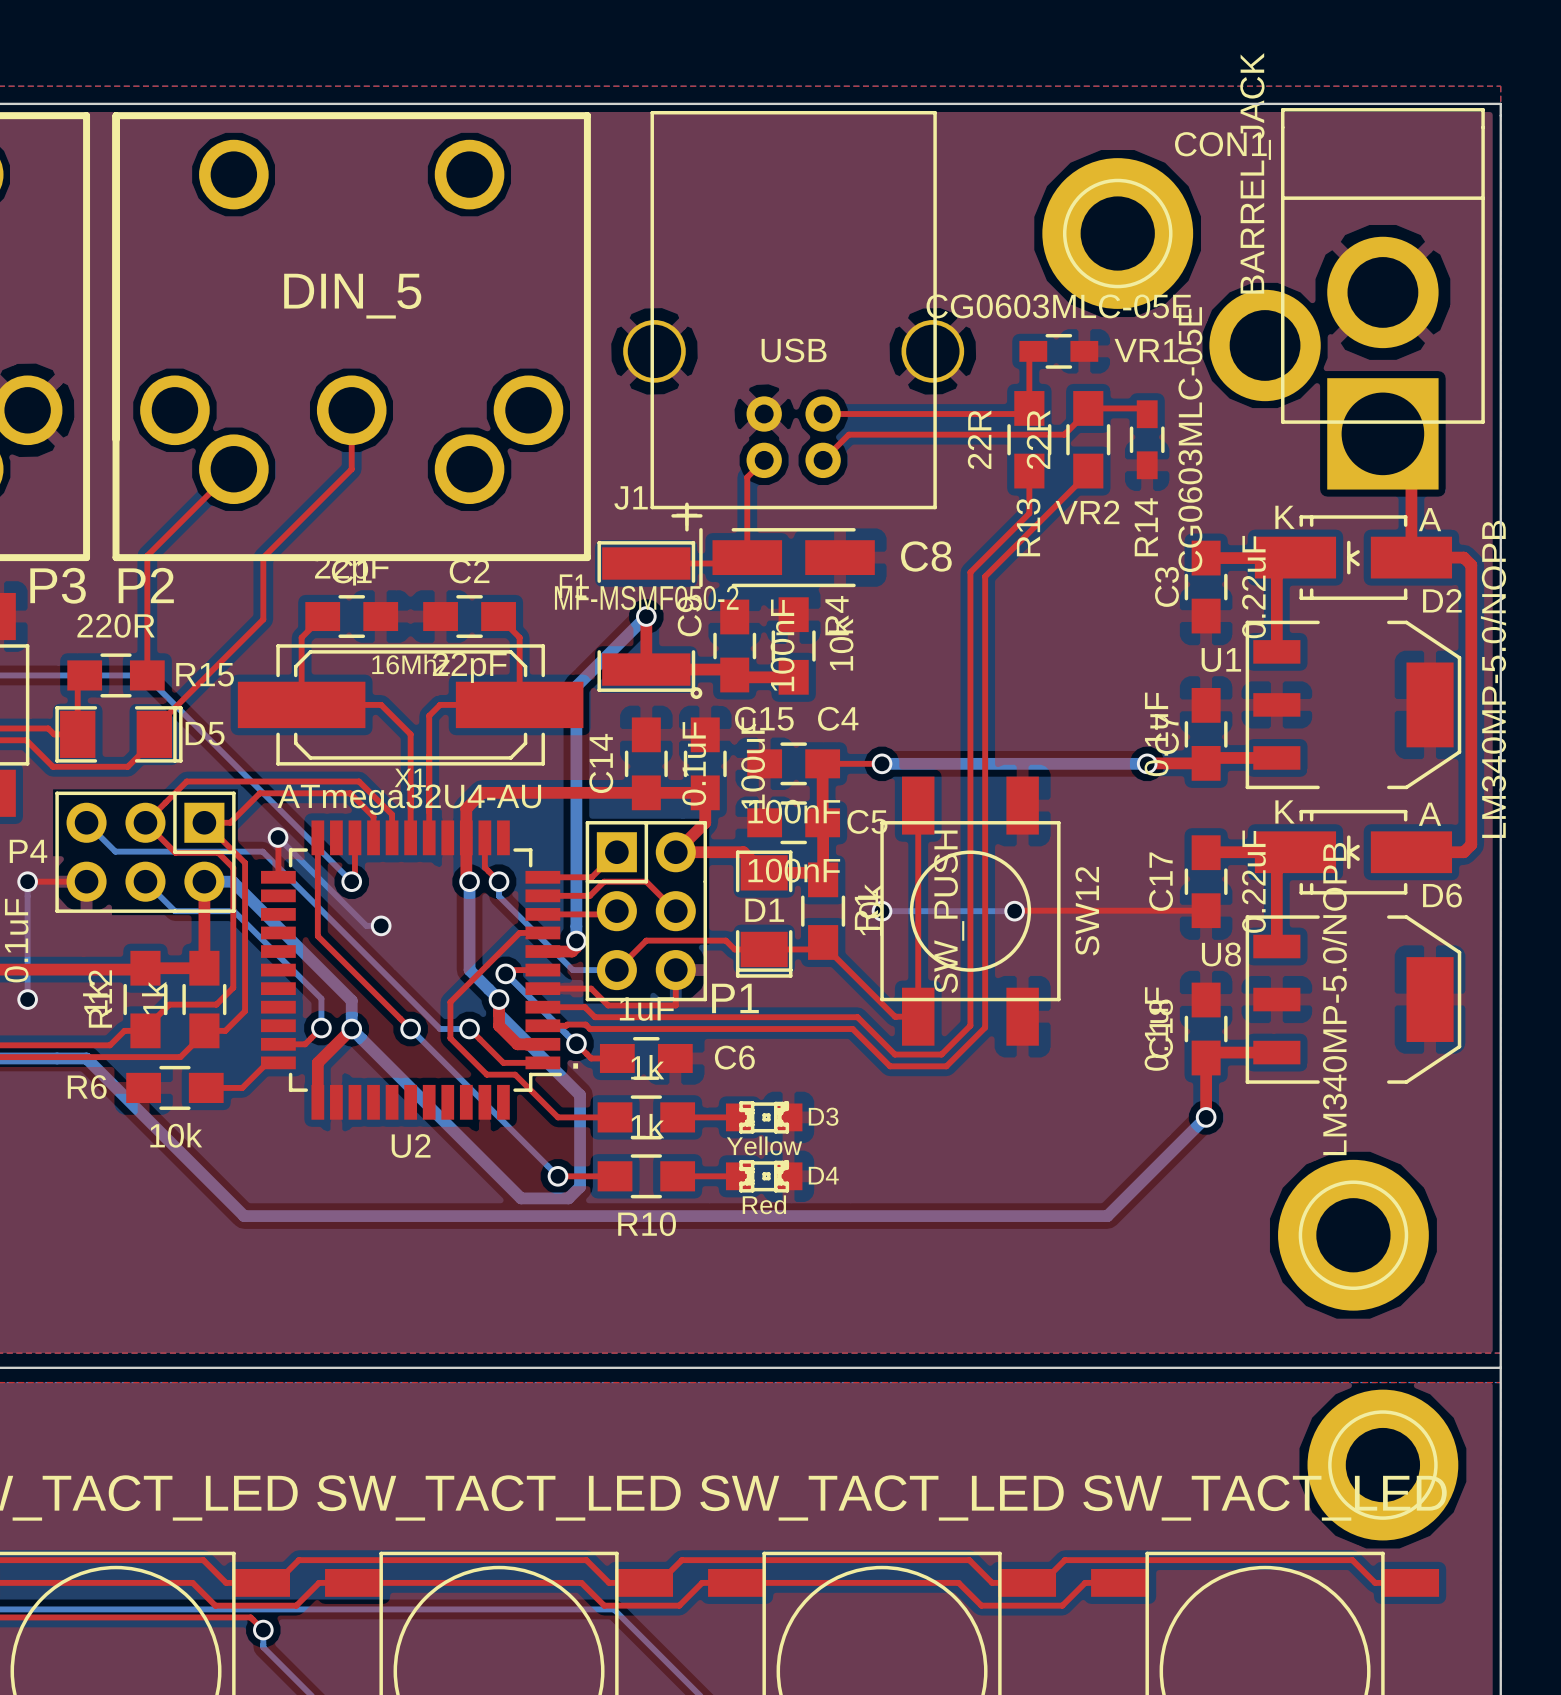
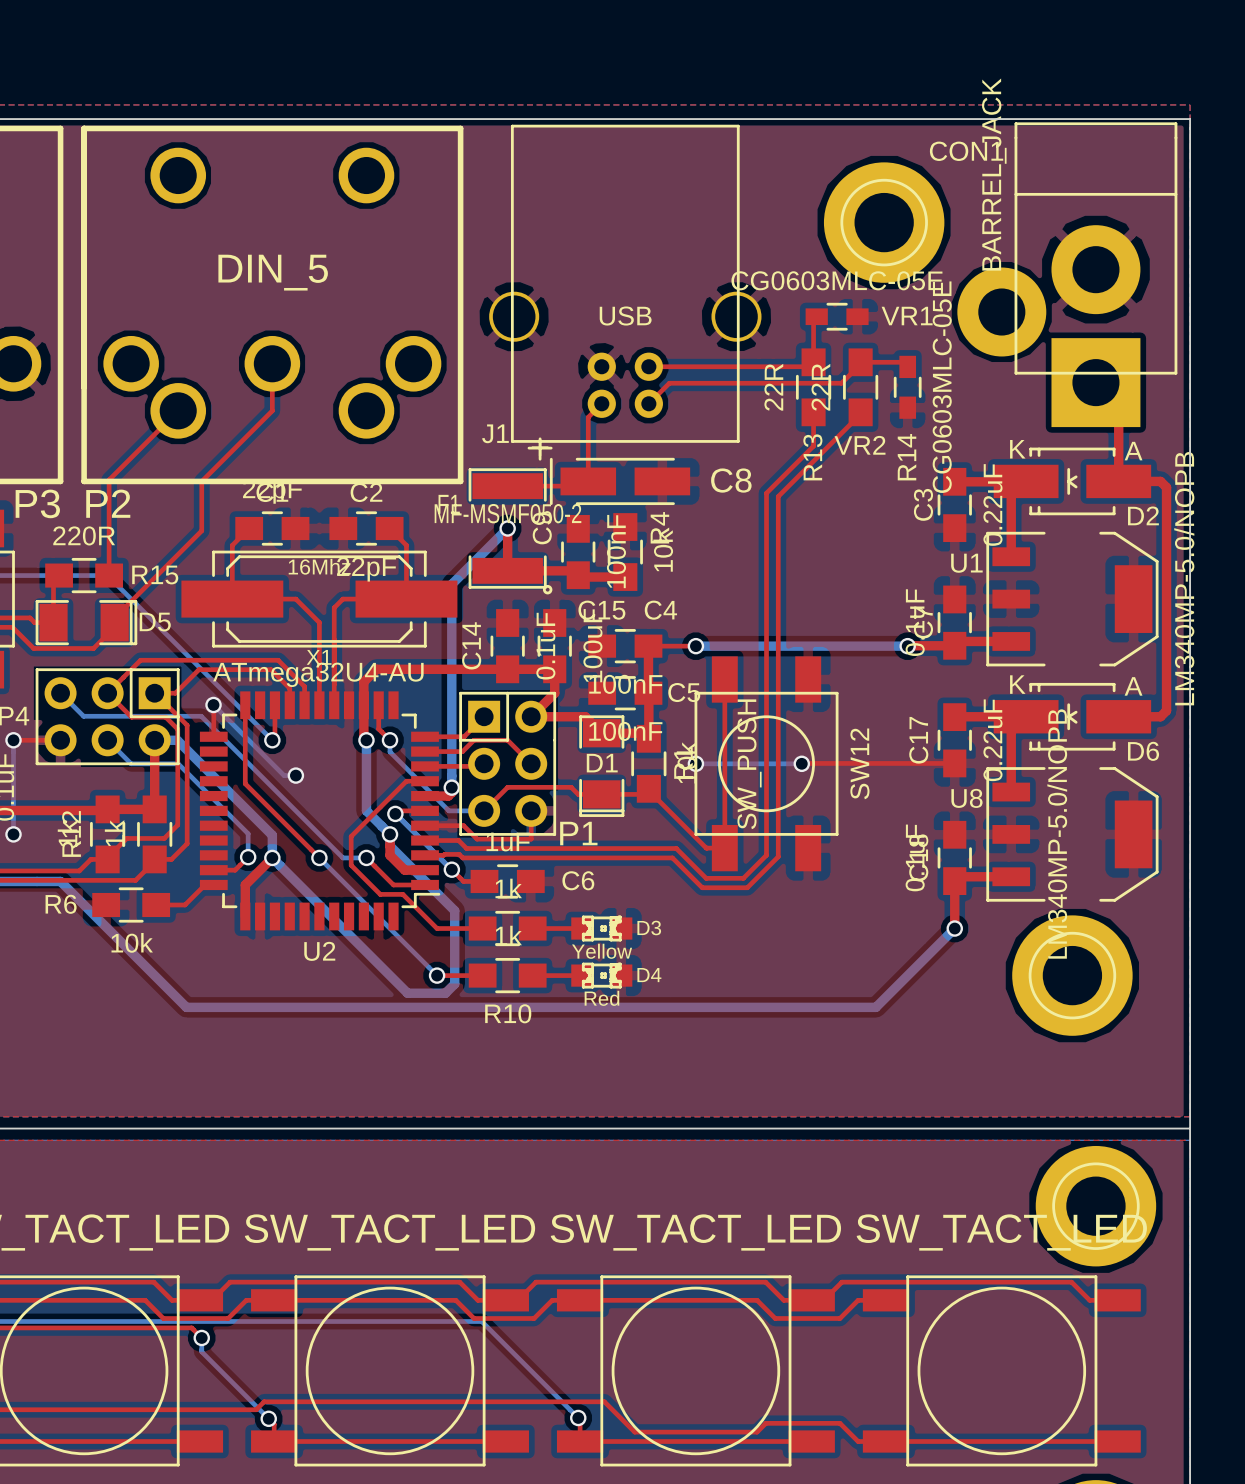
CON1 footprint: [1209, 108, 1485, 490] -> [957, 122, 1178, 428]
text: . (575, 1065) -> none
part position: (1353, 1235) -> (1072, 975)

